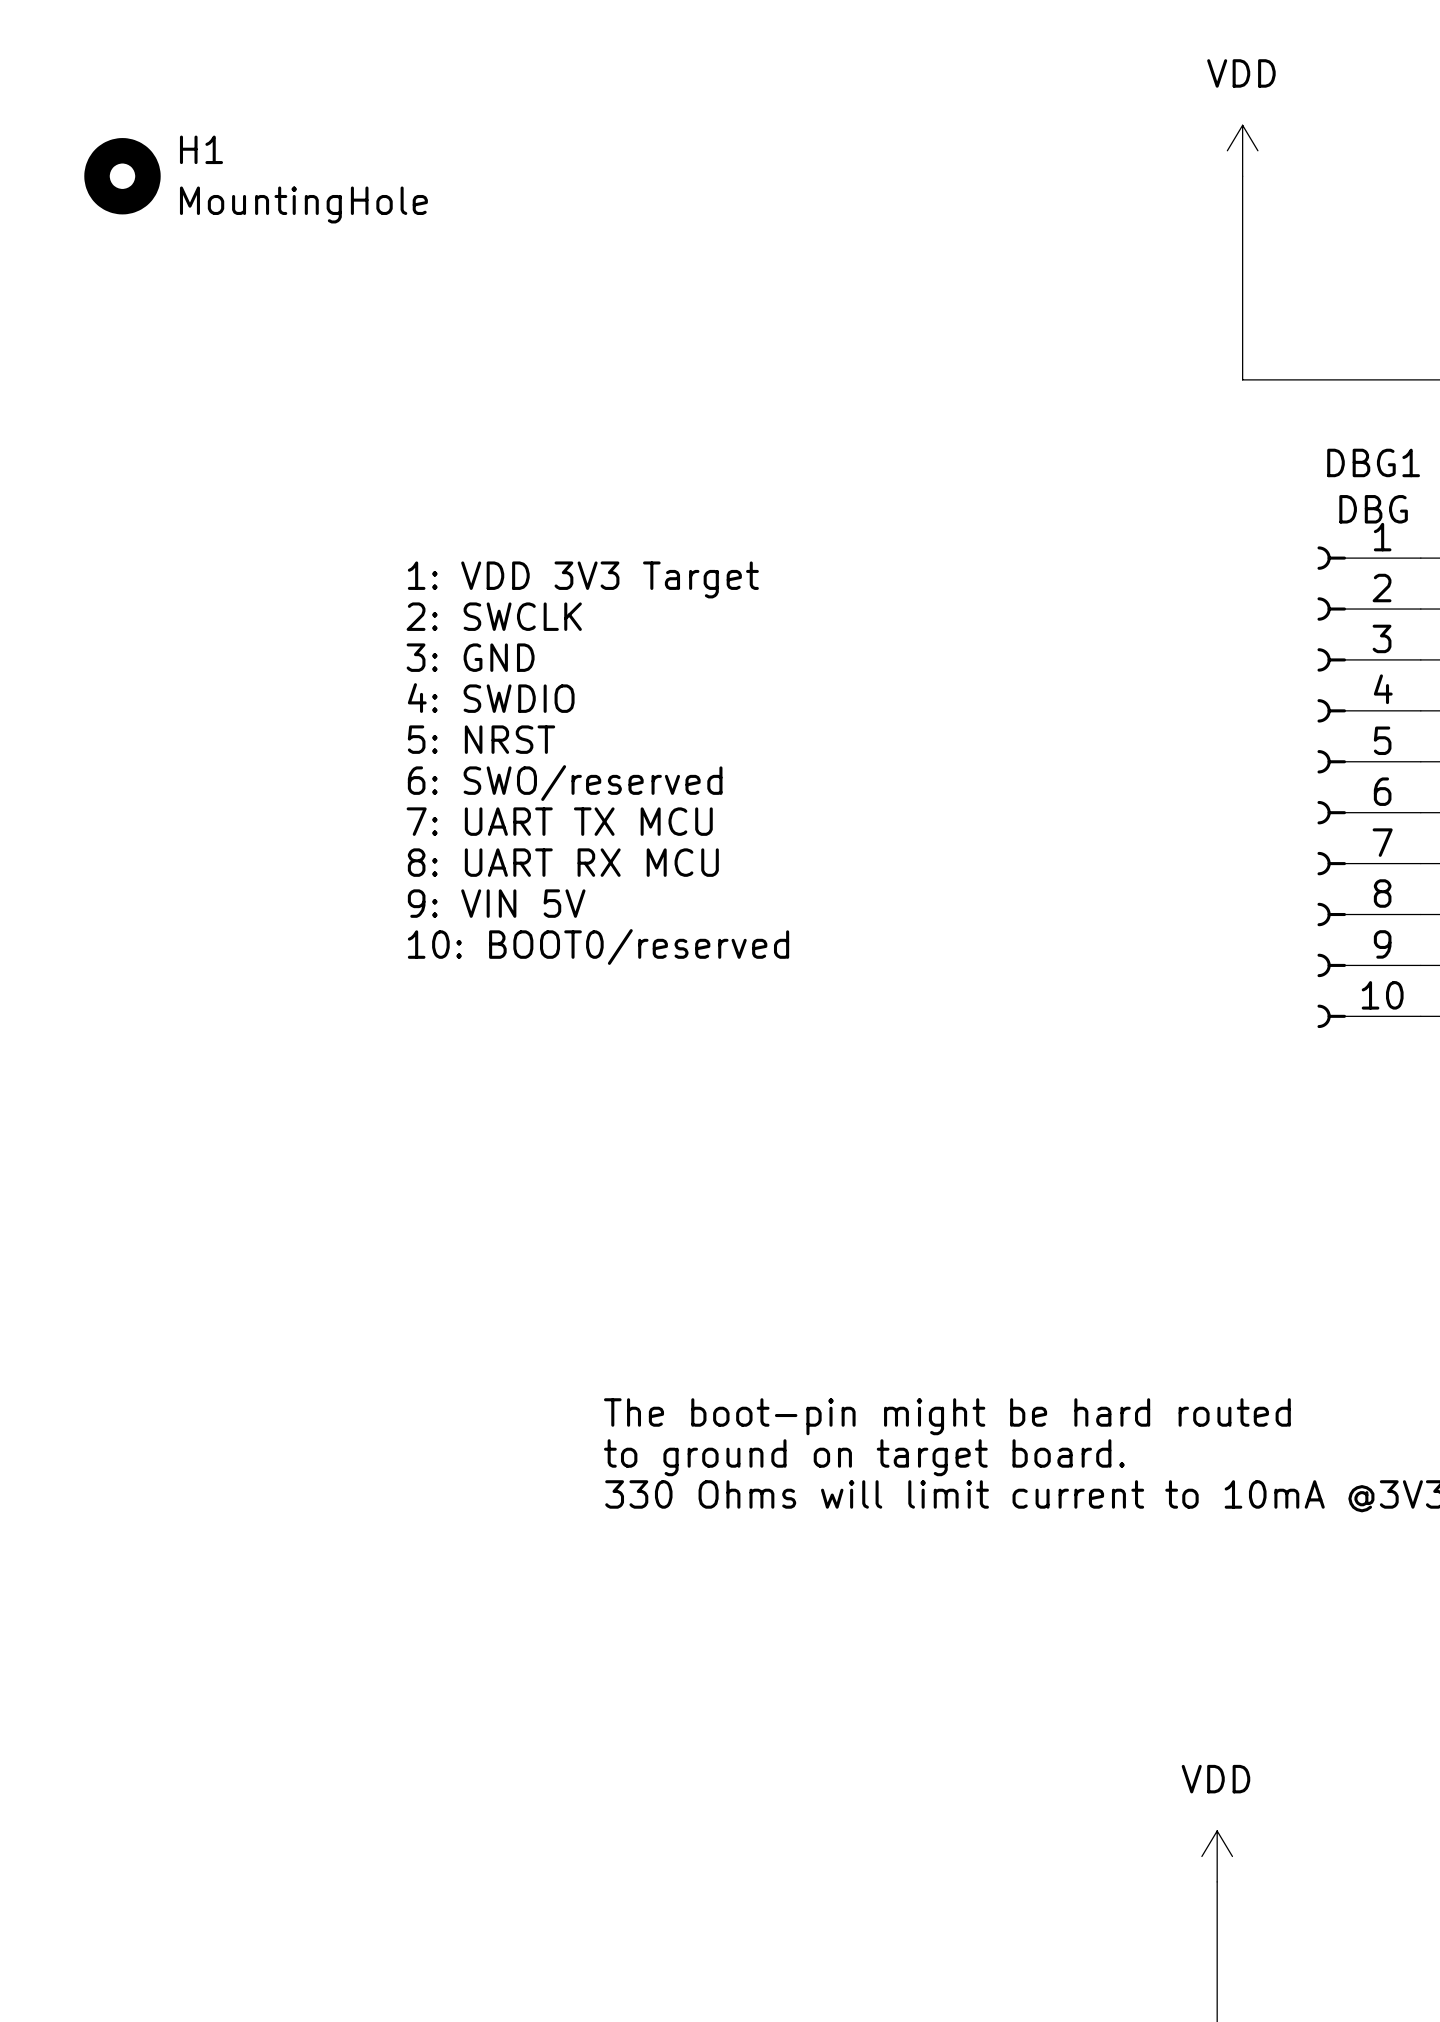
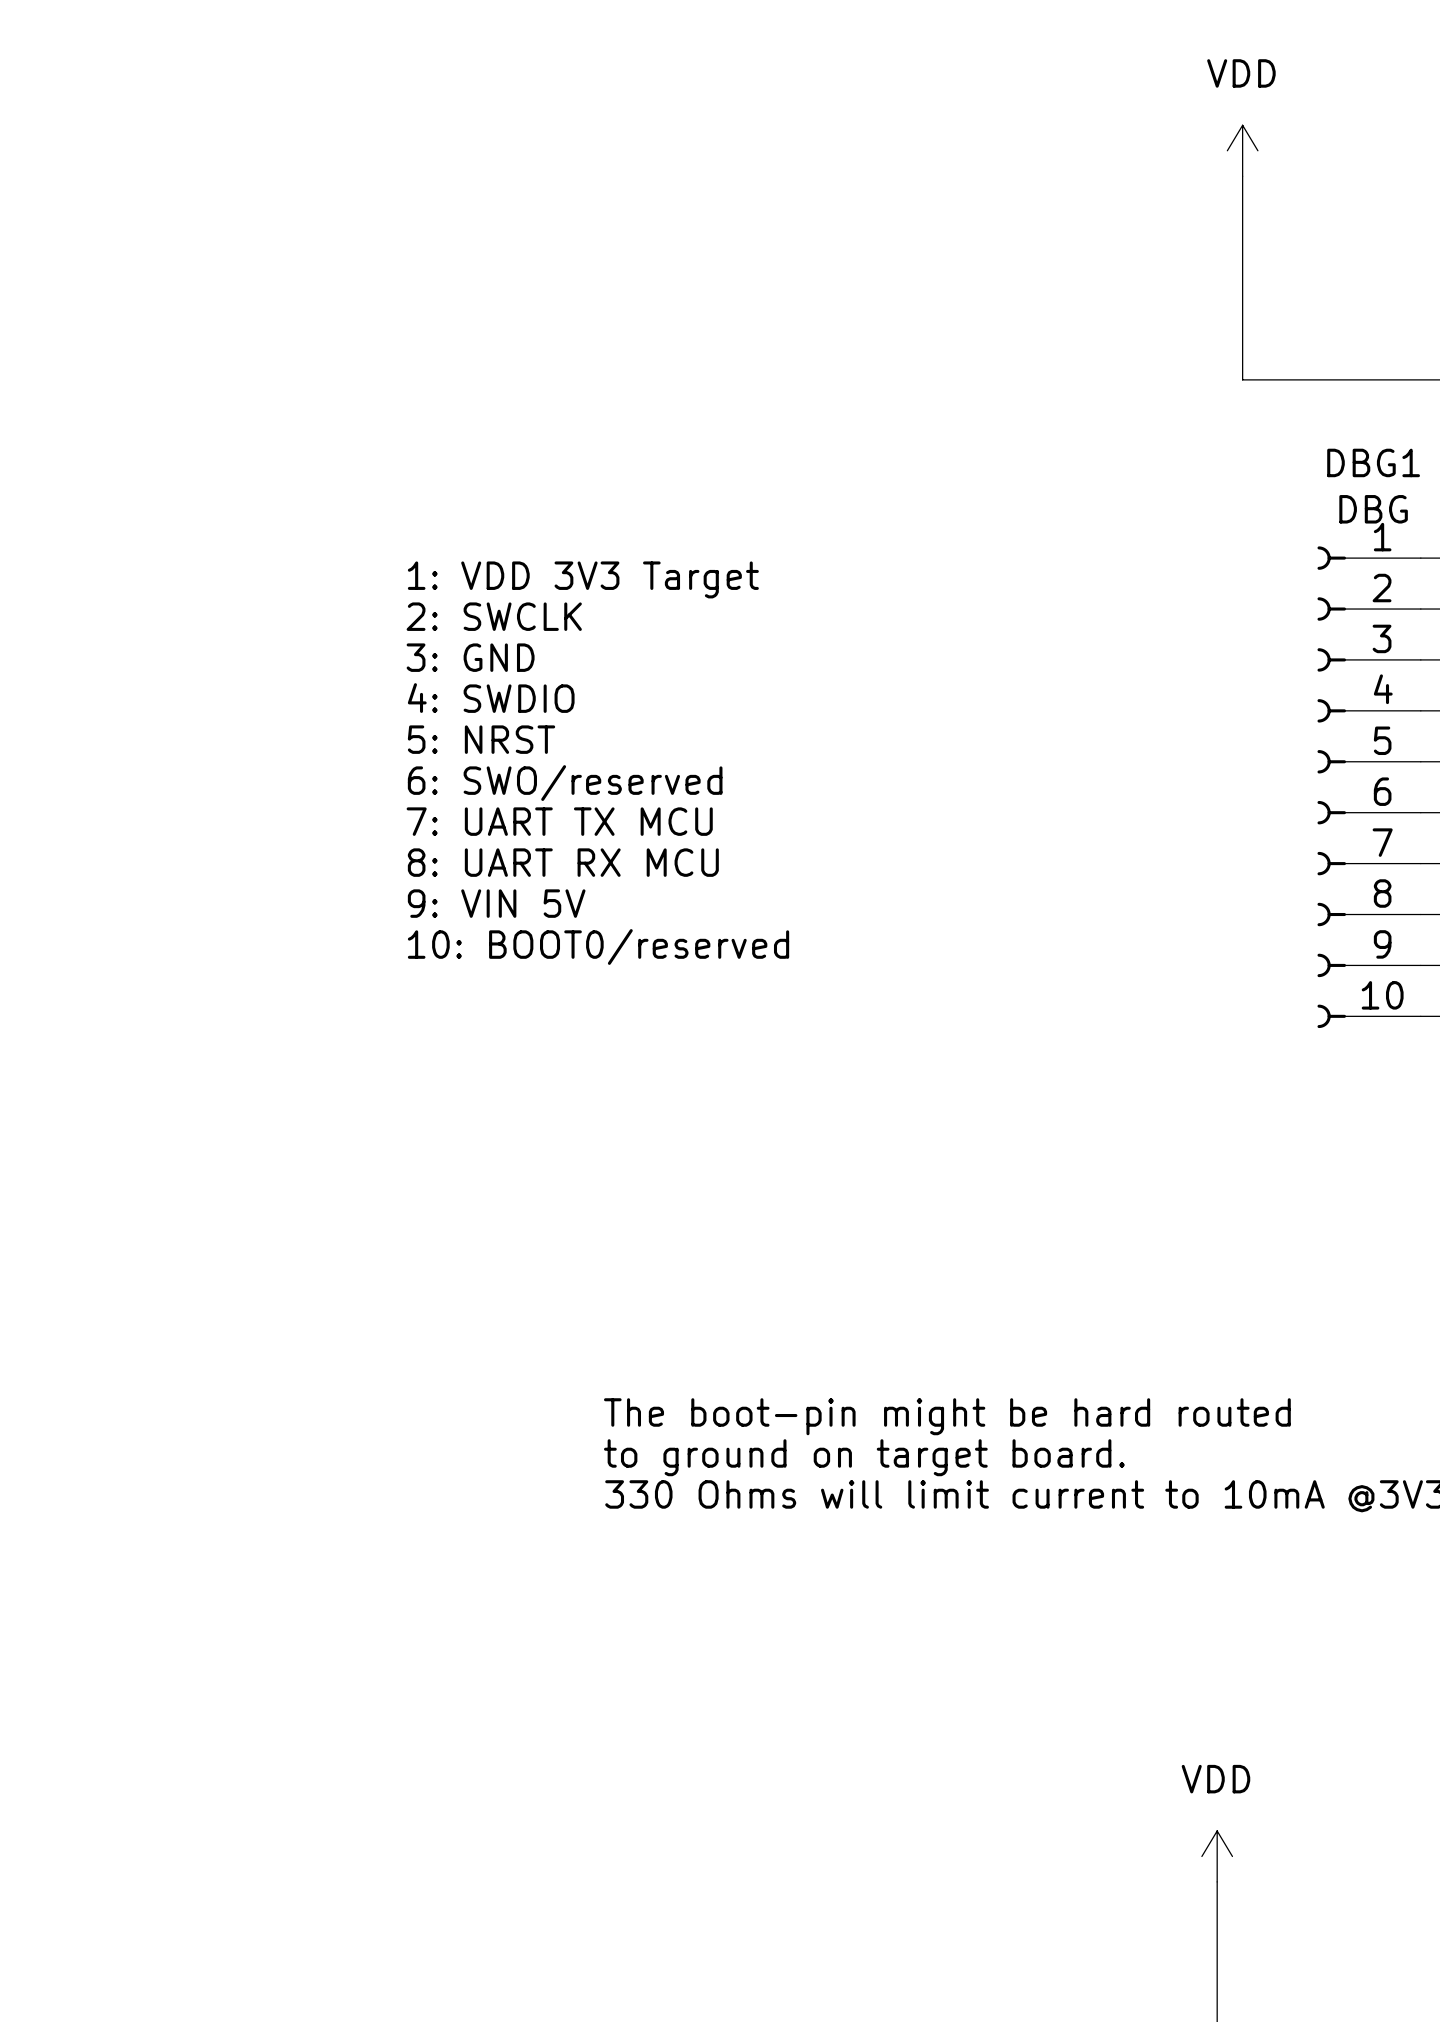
H1: MountingHole (122, 176) -> none

